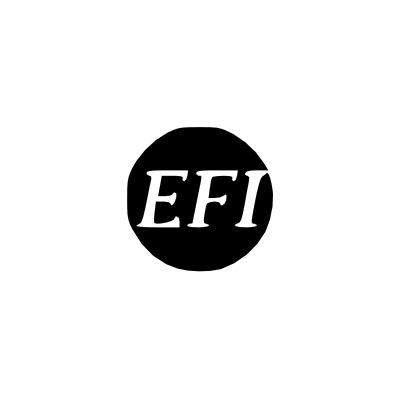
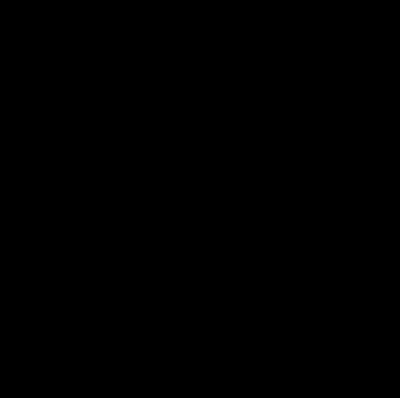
drawing: [127, 127, 274, 272] -> none

